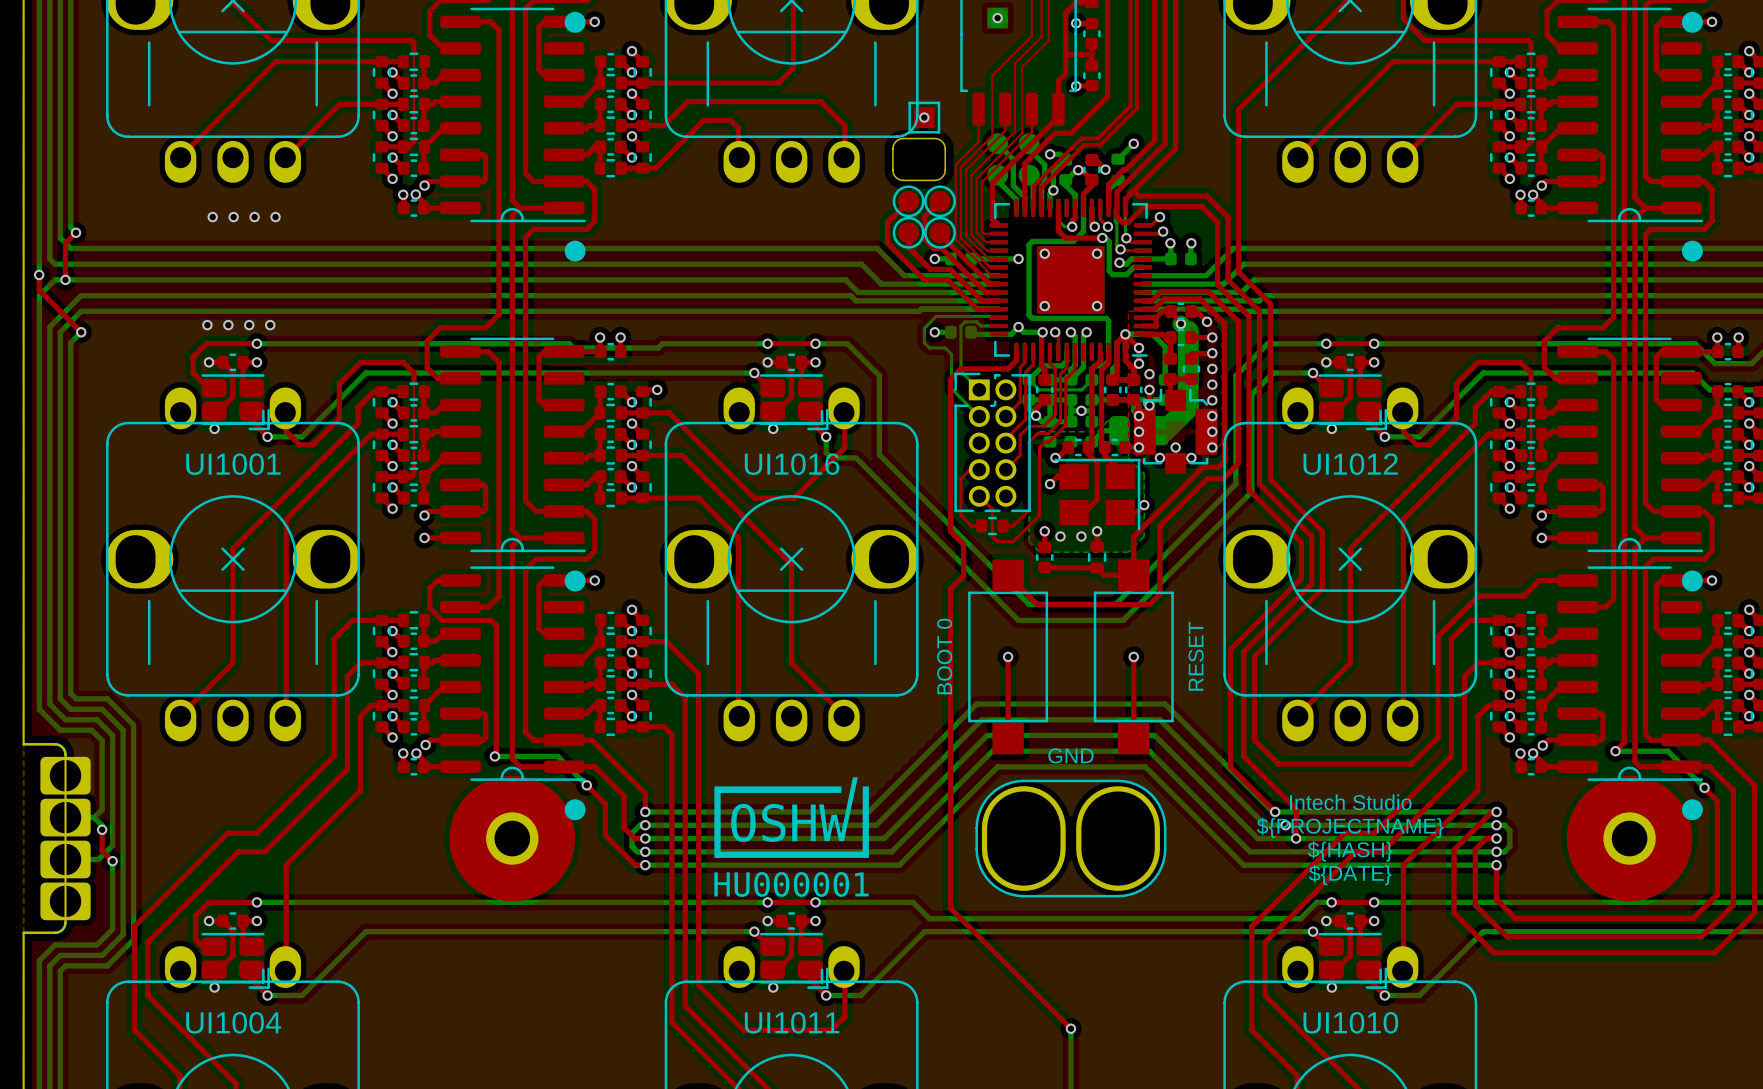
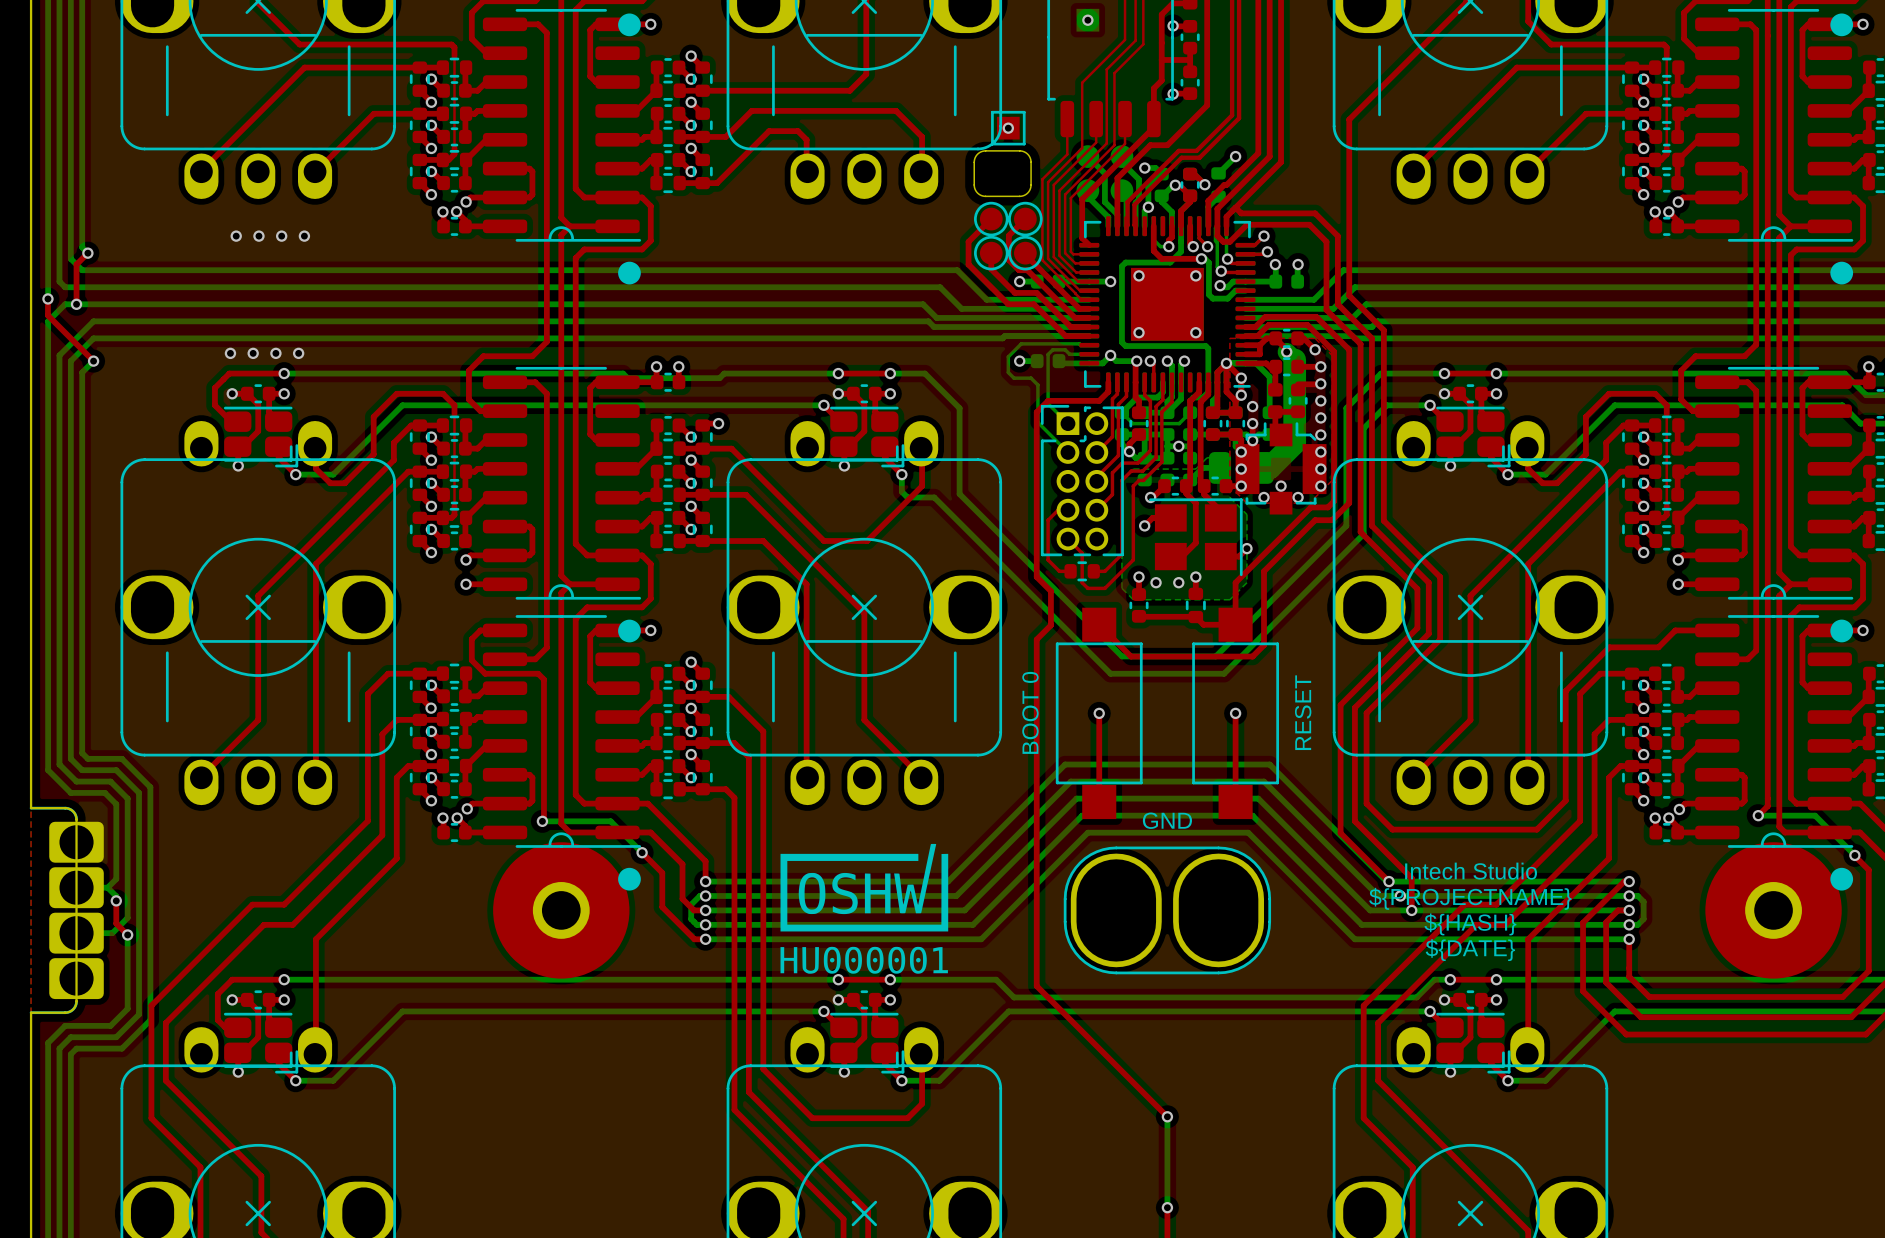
UI1001 name: UI1001 (233, 464) -> none
UI1016 name: UI1016 (792, 464) -> none
UI1012 name: UI1012 (1350, 464) -> none
UI1004 name: UI1004 (233, 1022) -> none
UI1011 name: UI1011 (792, 1022) -> none
UI1010 name: UI1010 (1350, 1022) -> none

